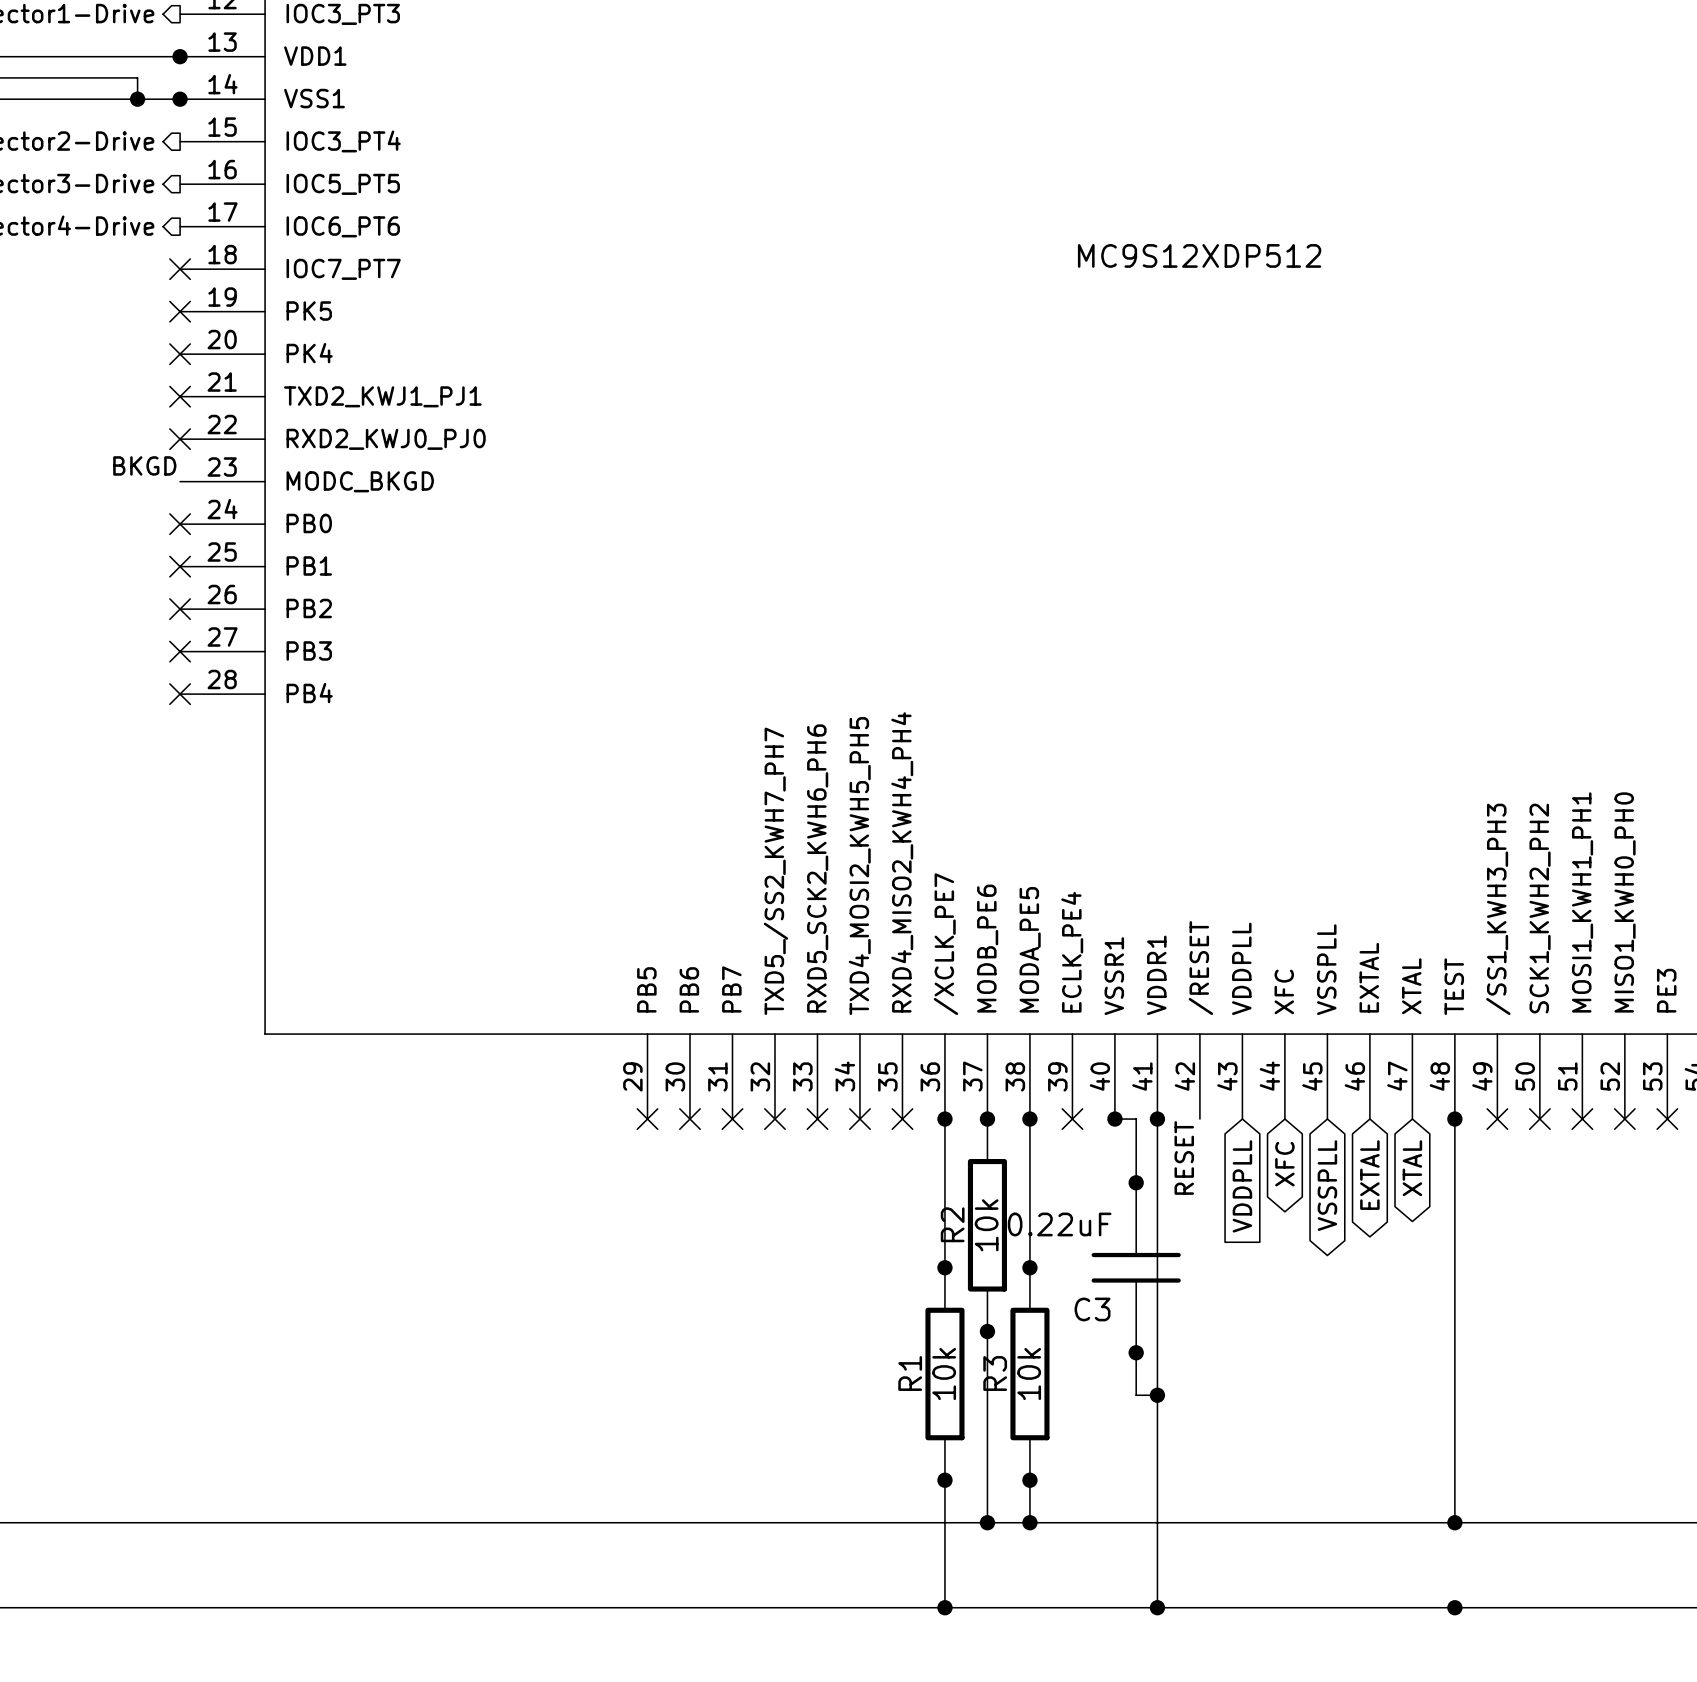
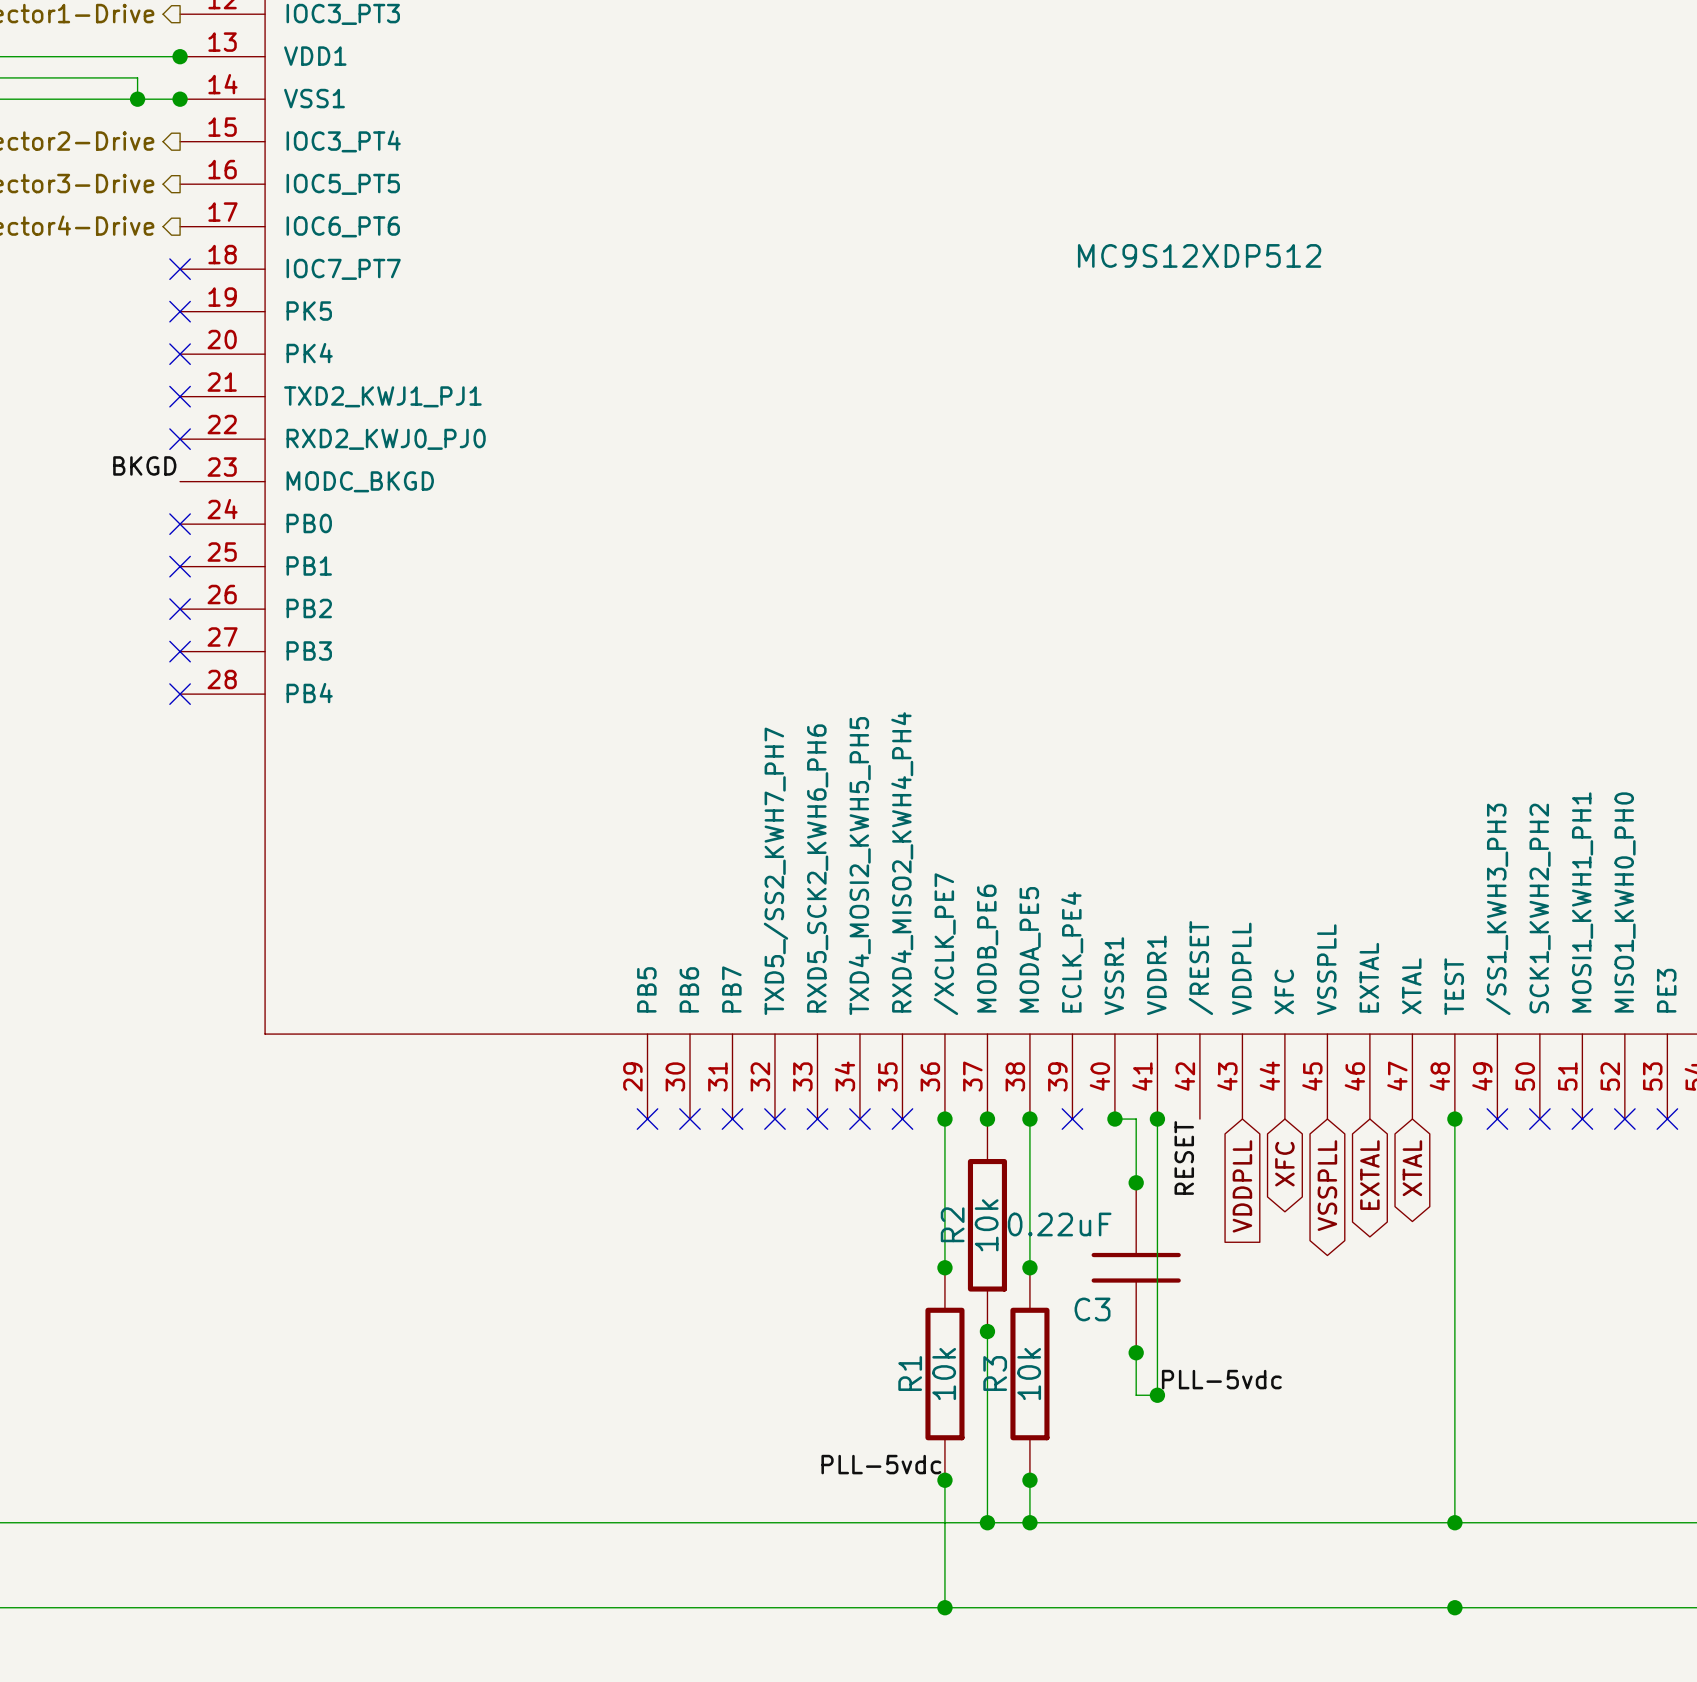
label: none -> PLL-5vdc (1221, 1379)
wire: (1157, 1395) (1157, 1607) -> none
label: none -> PLL-5vdc (881, 1464)
junction: (1157, 1607) -> none

